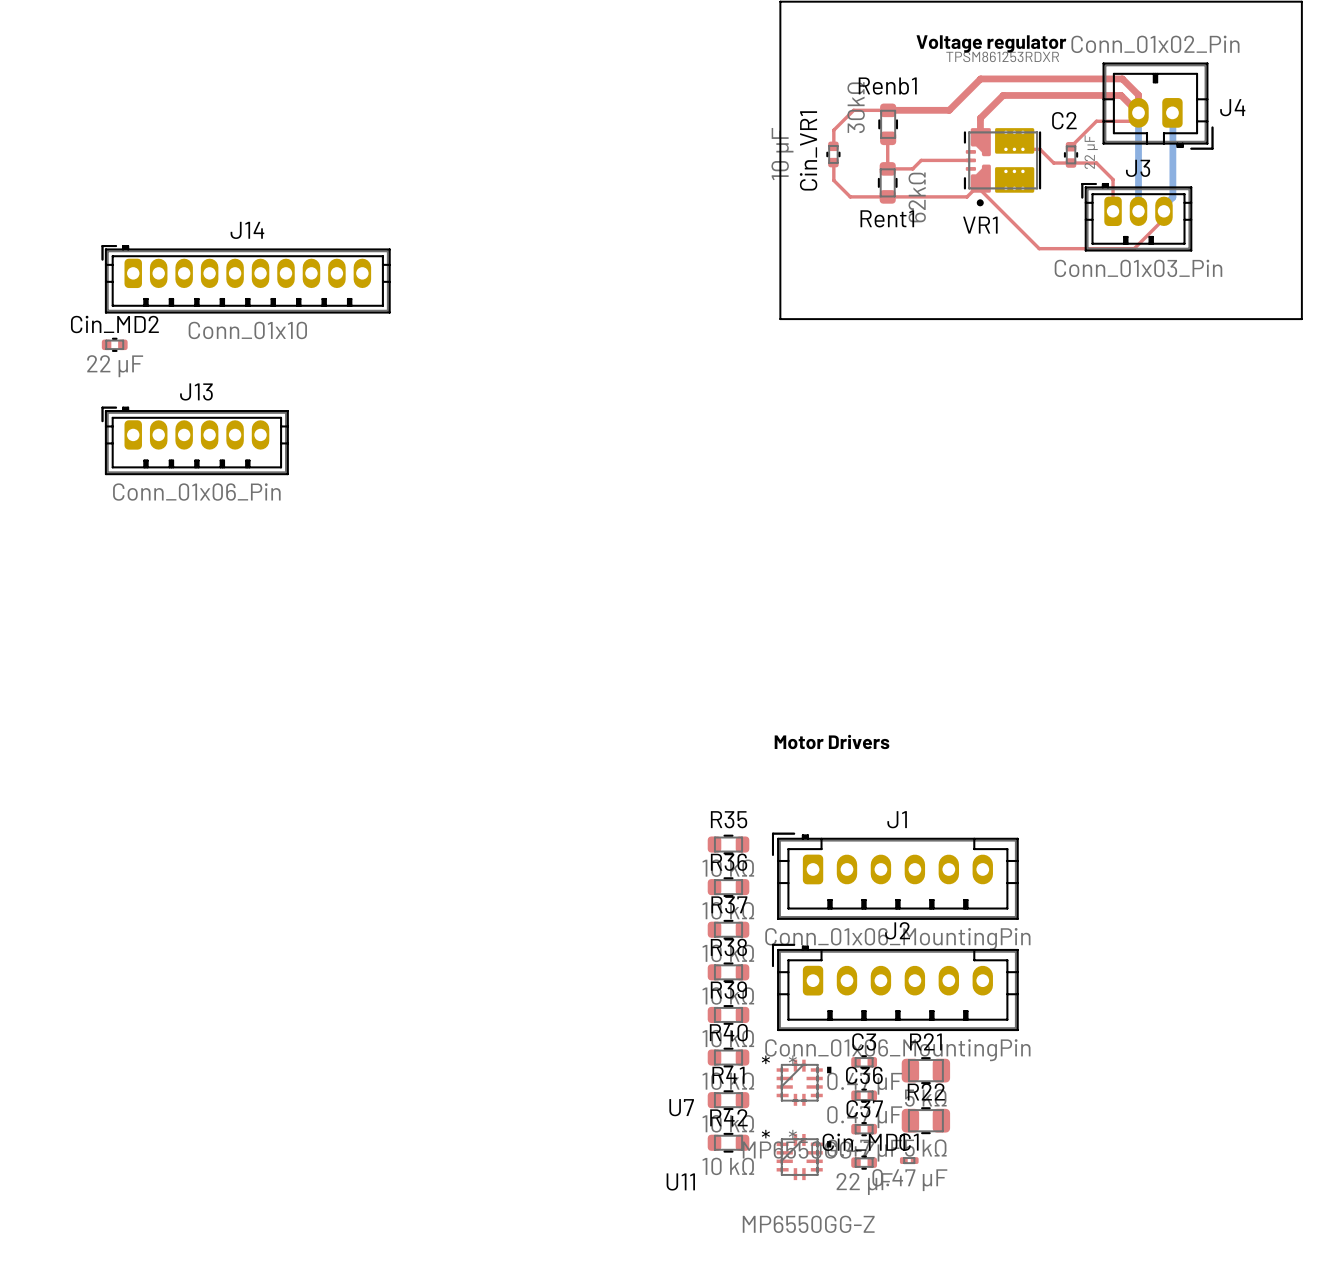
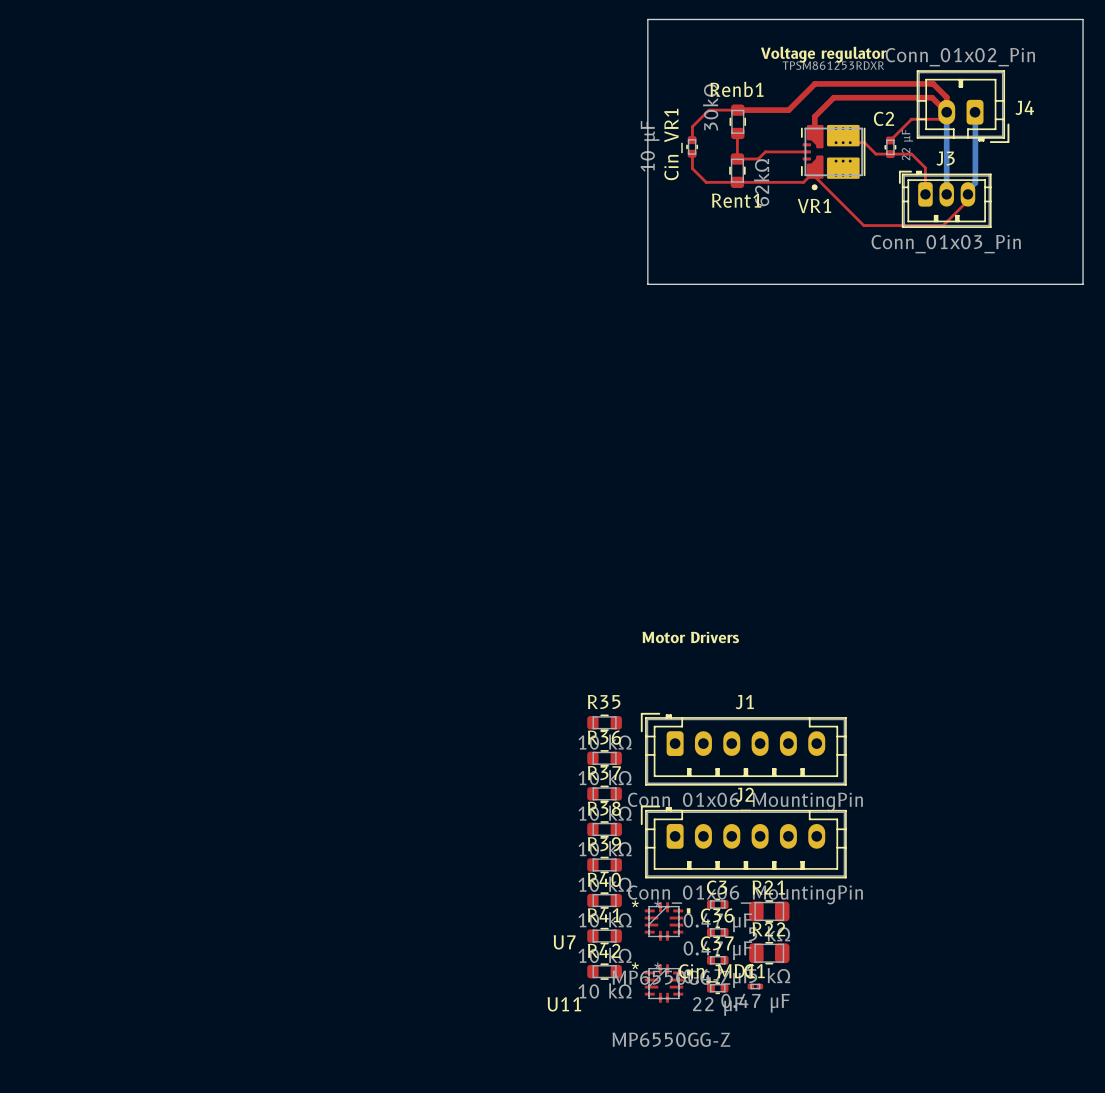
J14: Conn_01x10 (246, 279) -> none
Cin_MD2: 22 μF (114, 344) -> none
J13: Conn_01x06_Pin (195, 440) -> none

